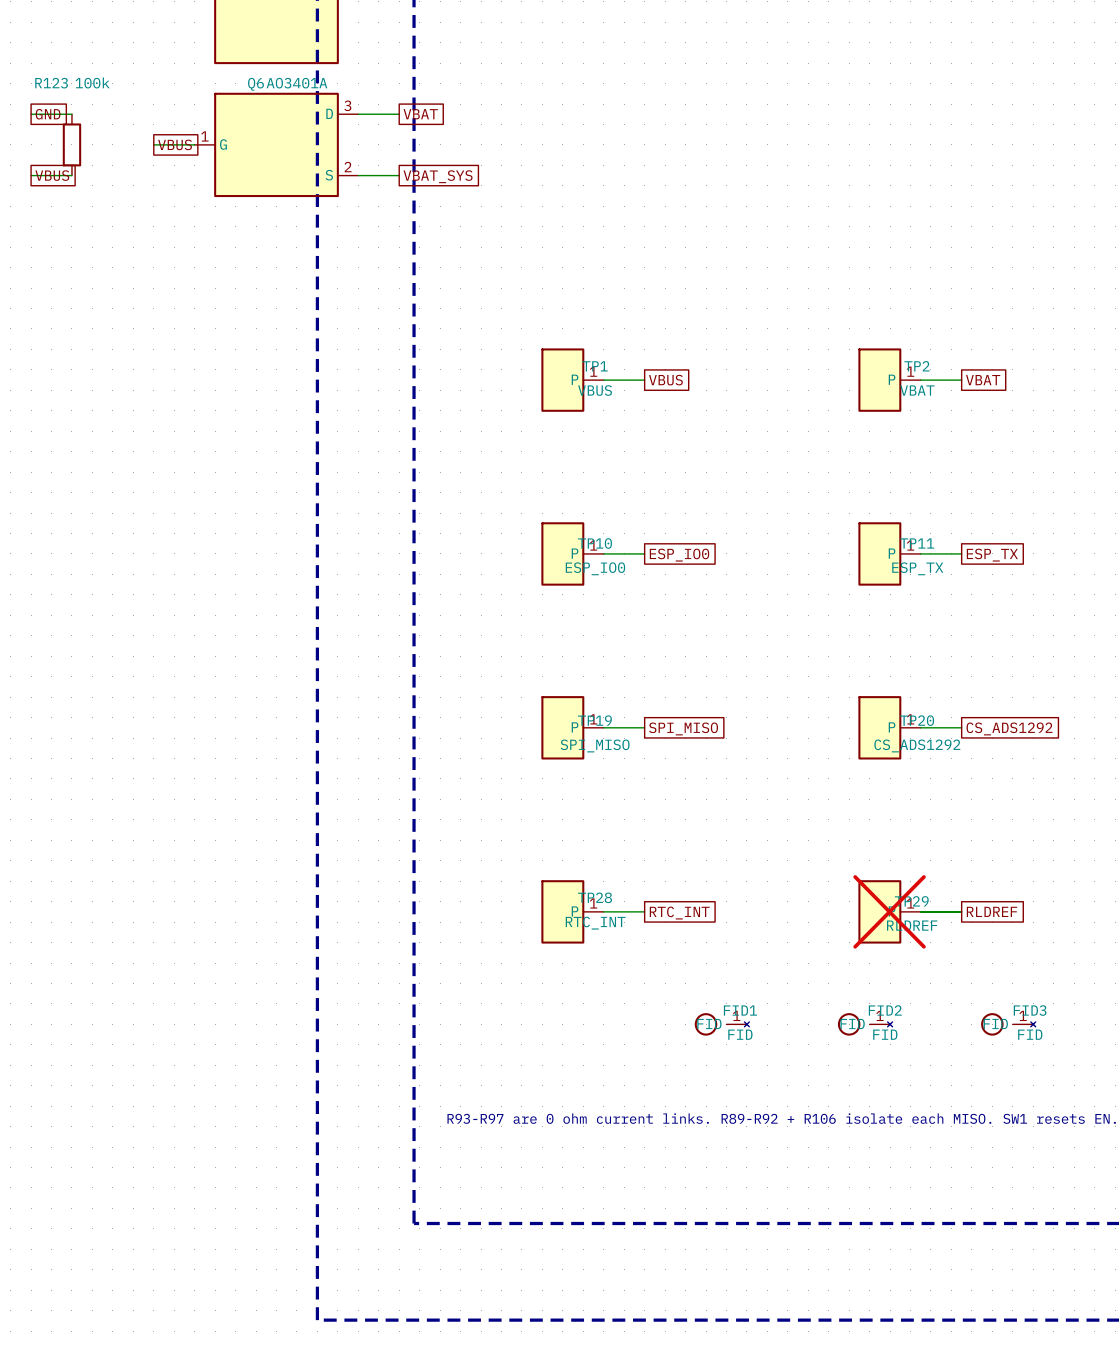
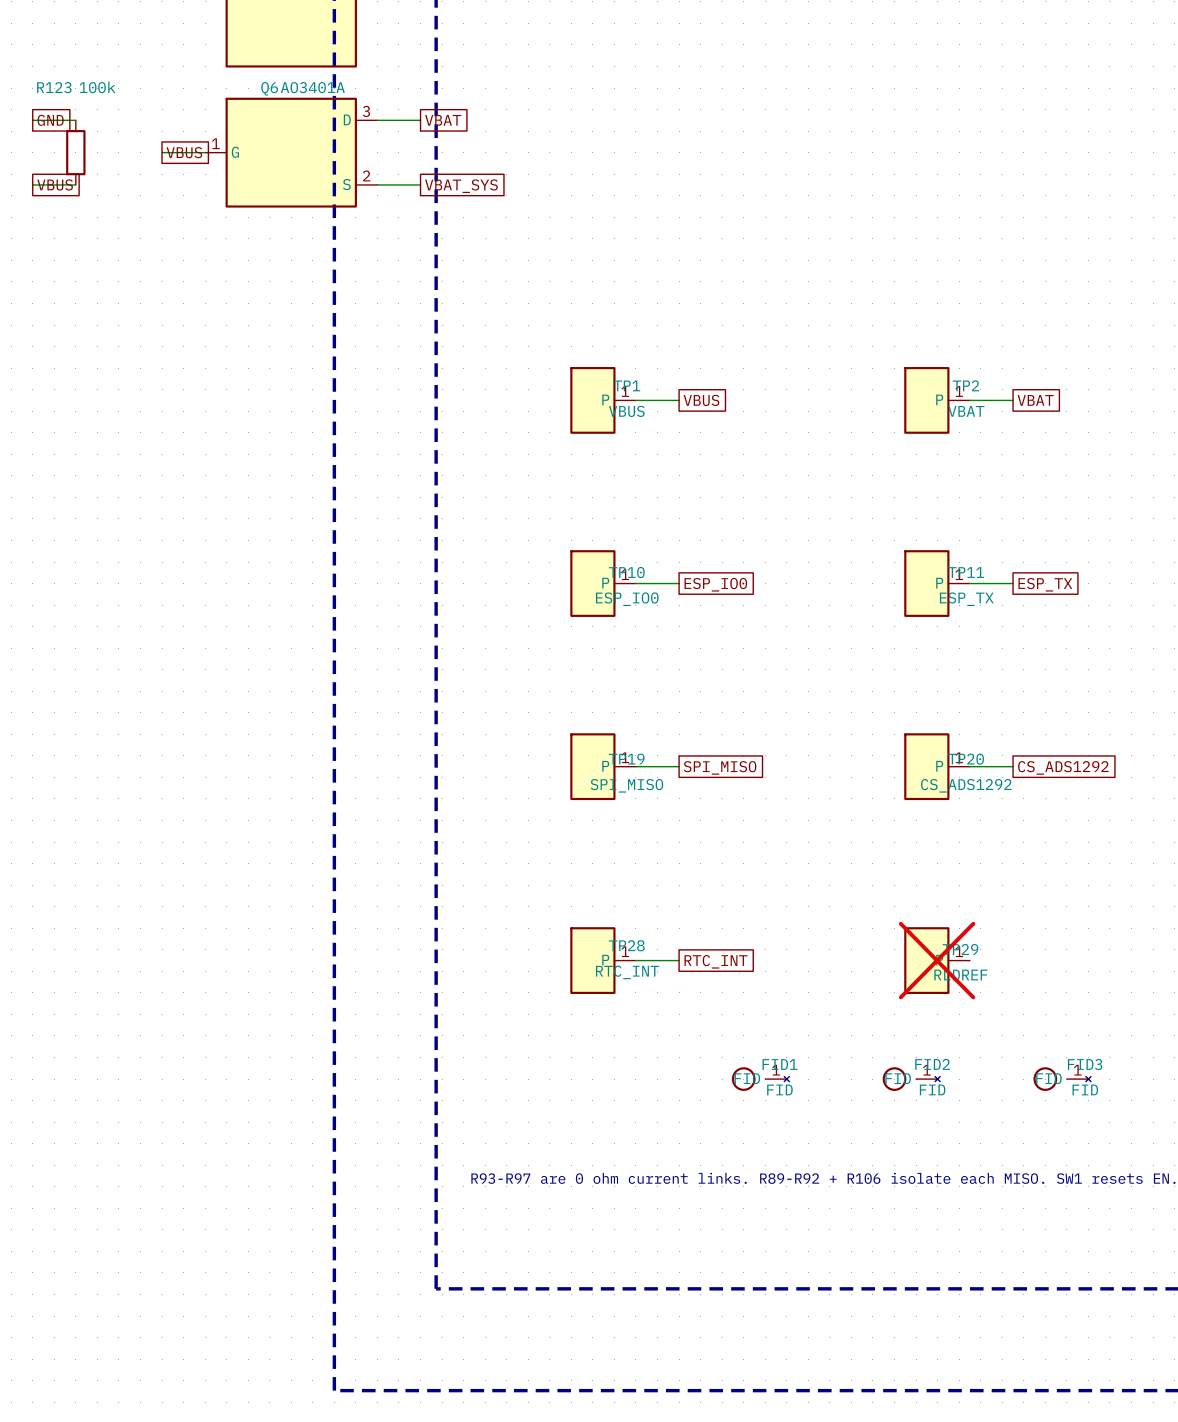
wire: (920, 911) (961, 911) -> none
global label: RLDREF (992, 911) -> none

